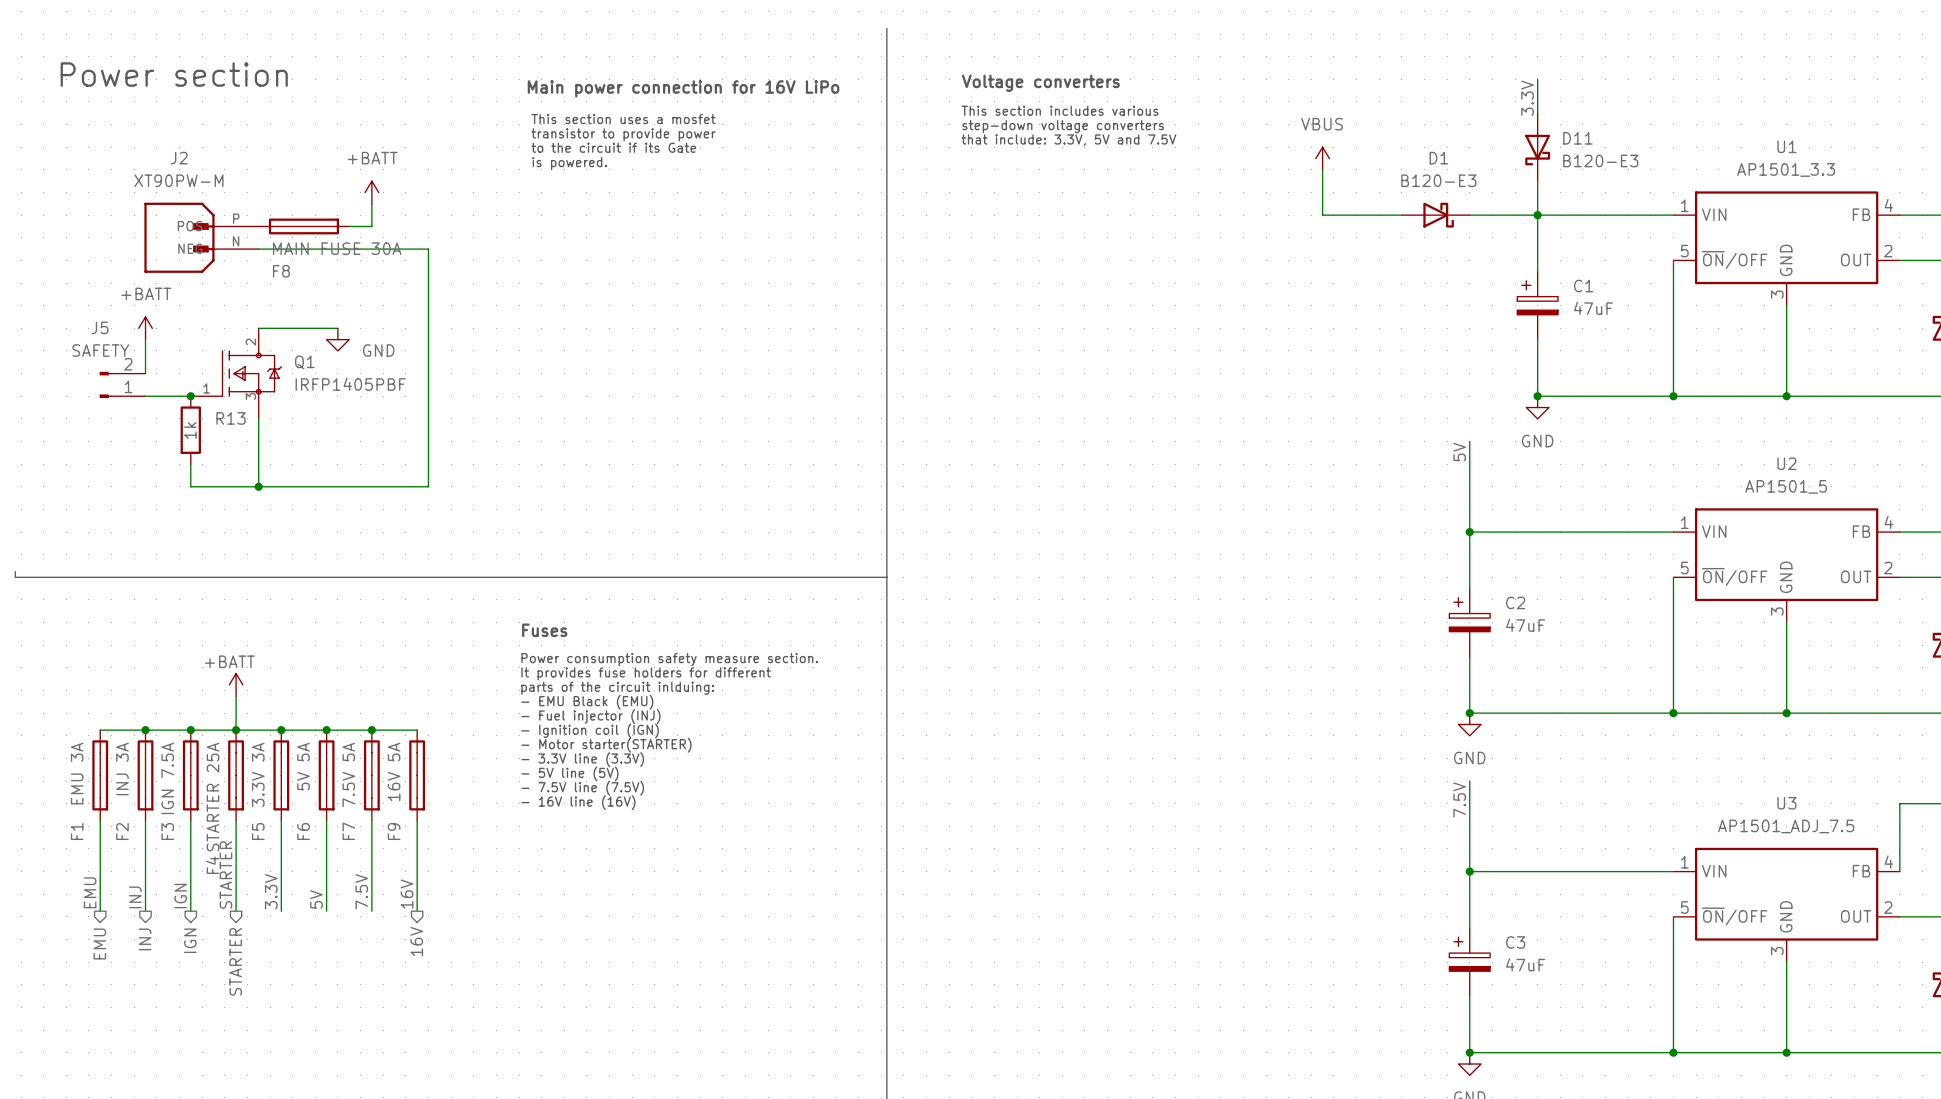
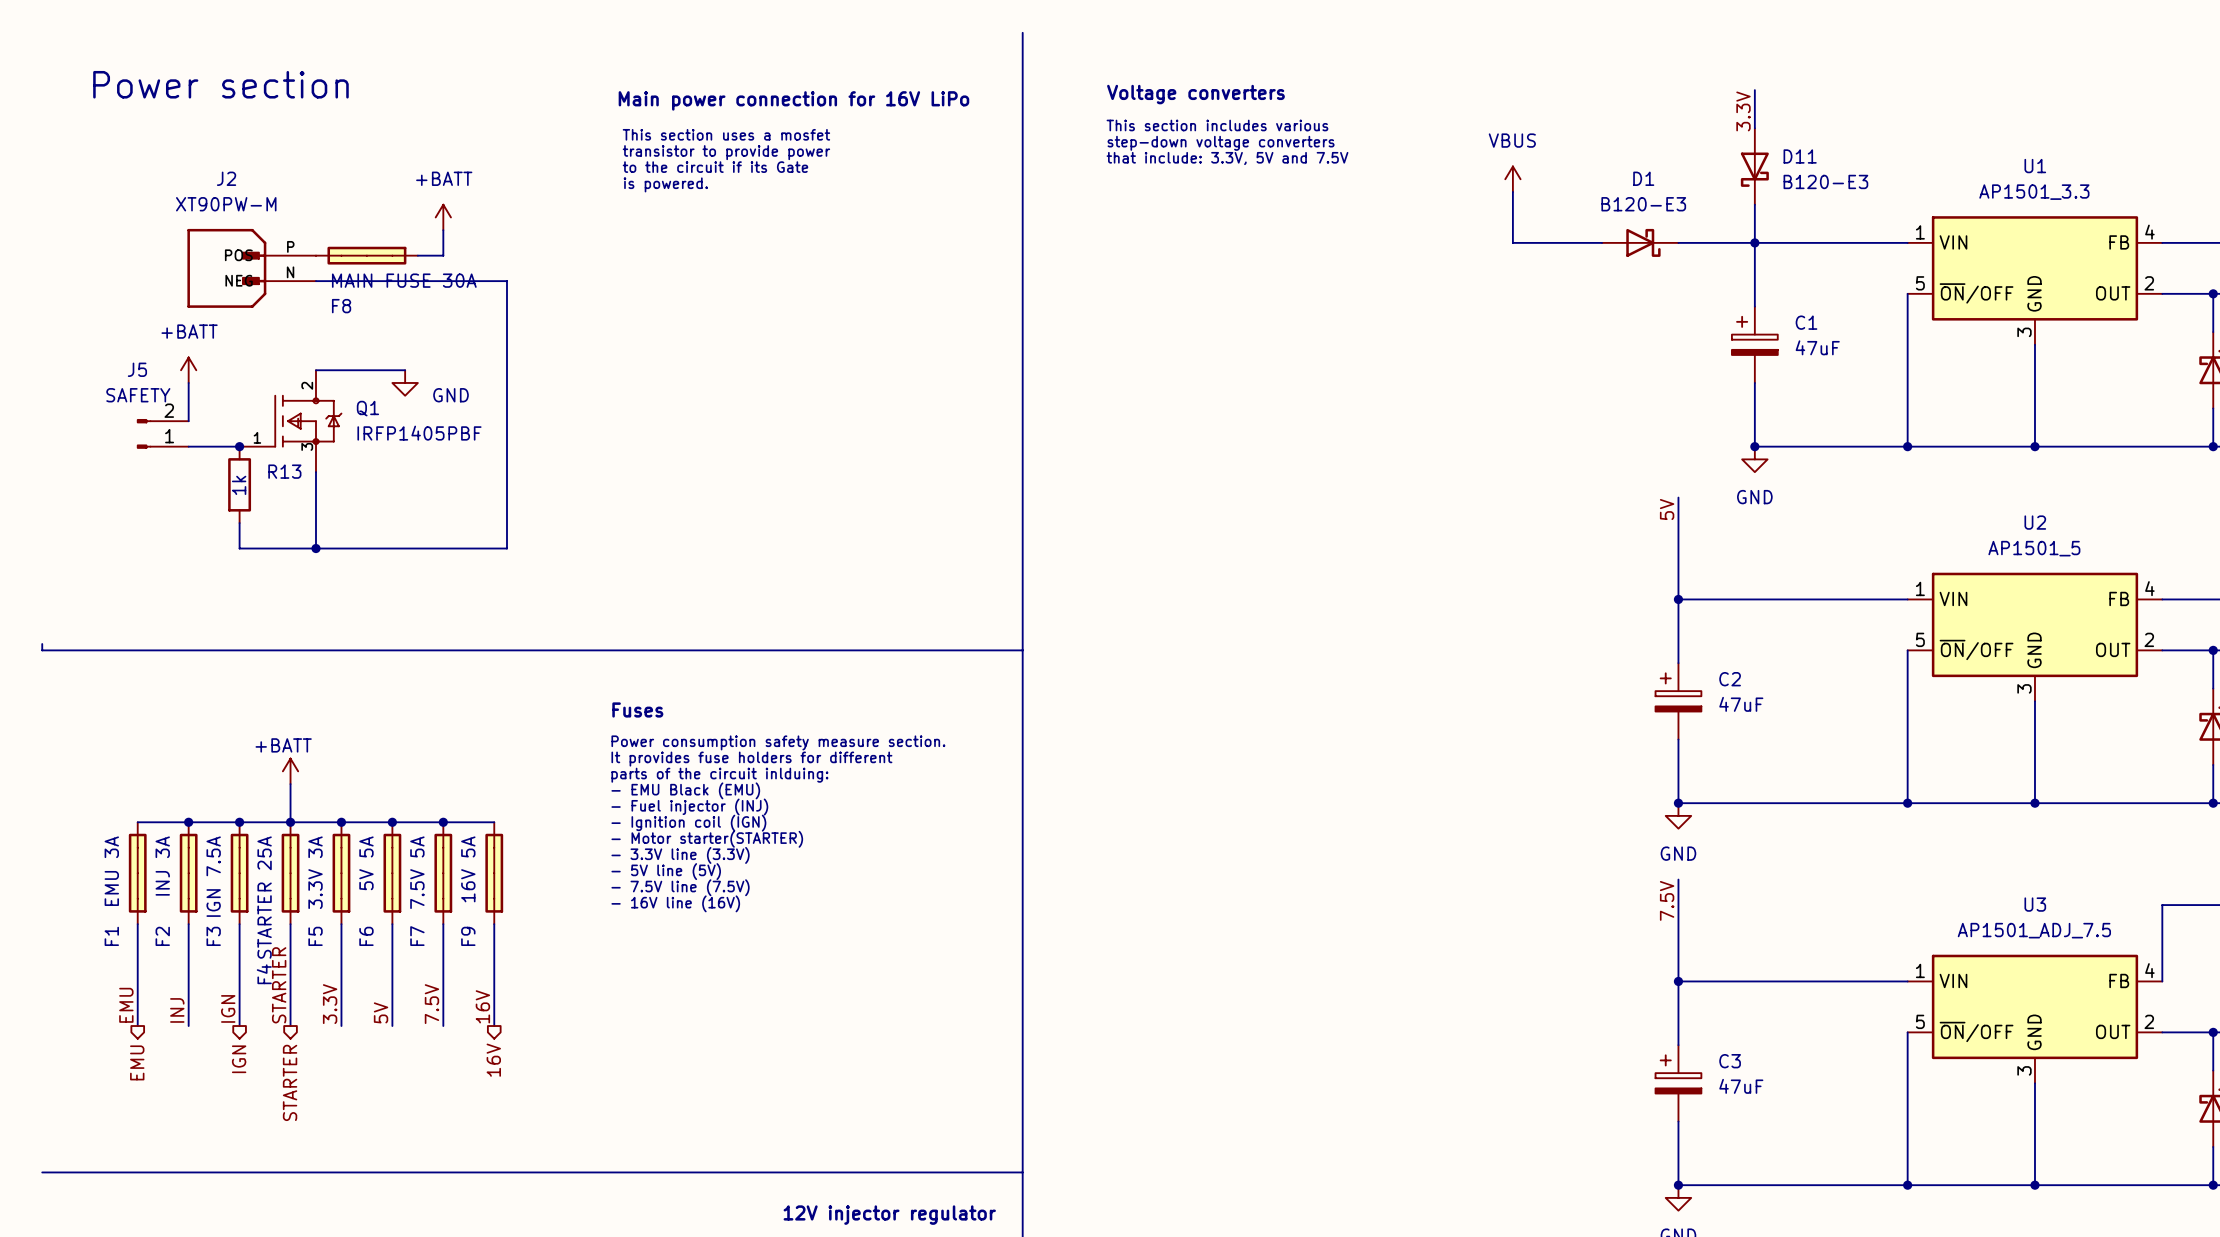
hierarchical label: INJ (145, 939) -> none
line: none -> (42, 1172) (1022, 1172)
text: none -> 12V injector regulator (889, 1215)

